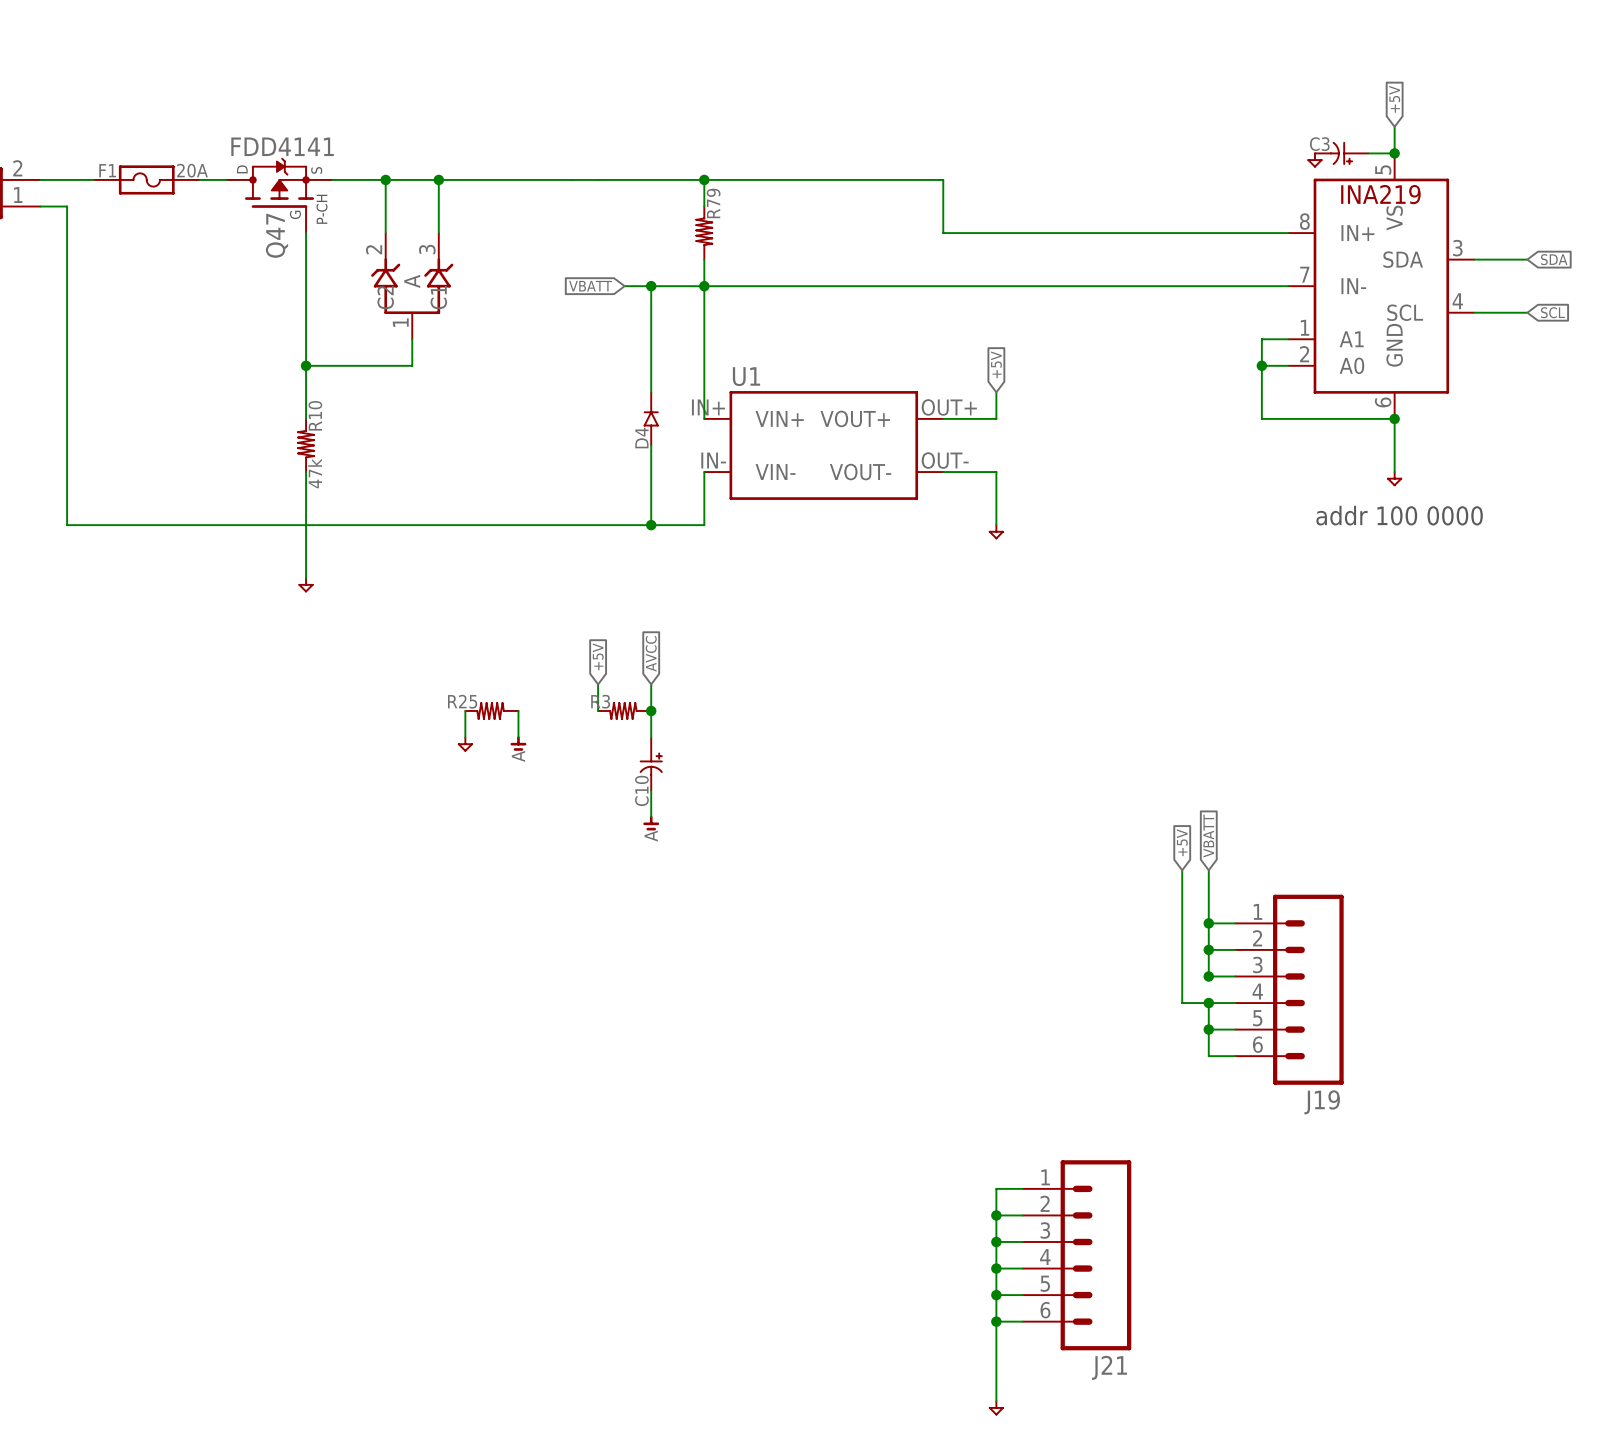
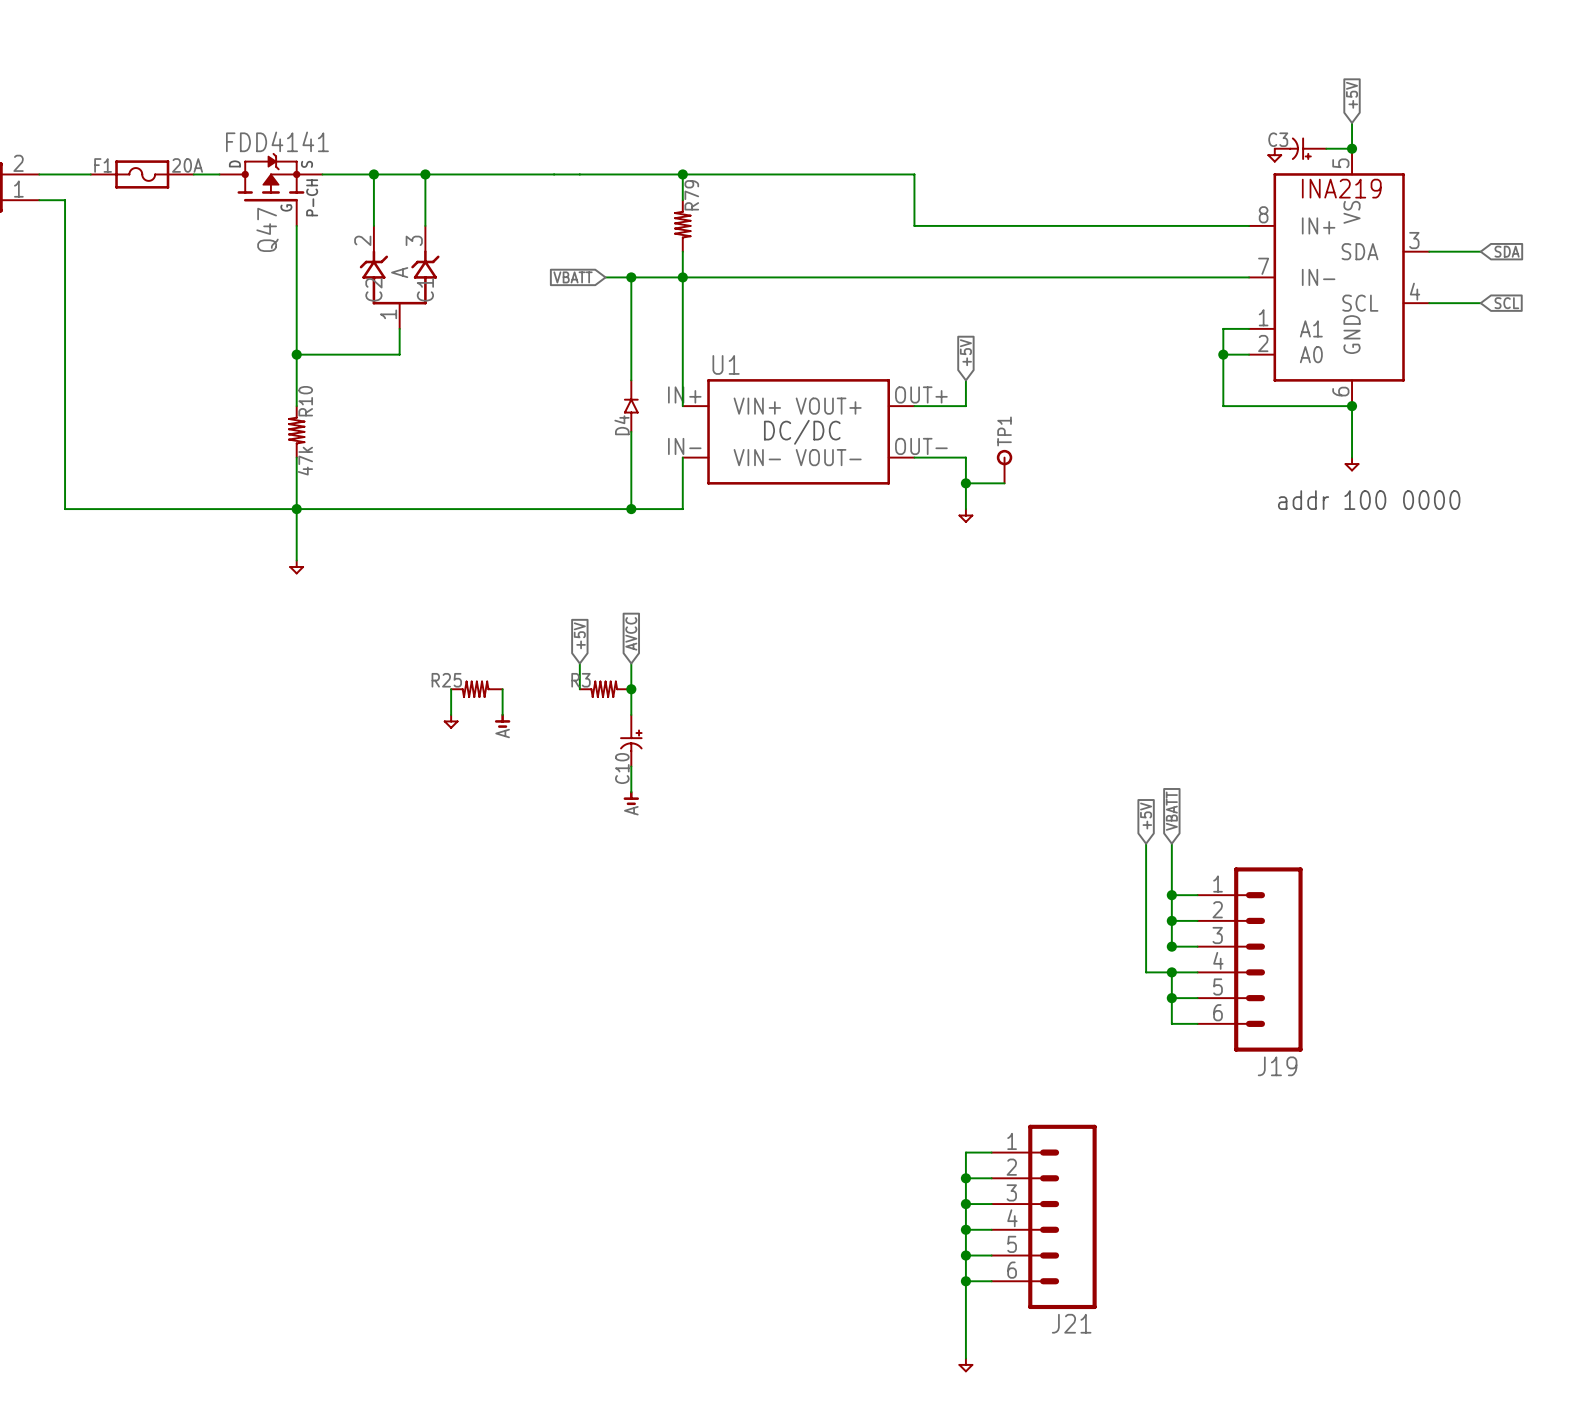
U1 text: none -> DC/DC (802, 432)
TP1: none -> (1004, 466)
wire: none -> (965, 483) (1004, 483)
junction: none -> (965, 483)
junction: none -> (296, 509)

